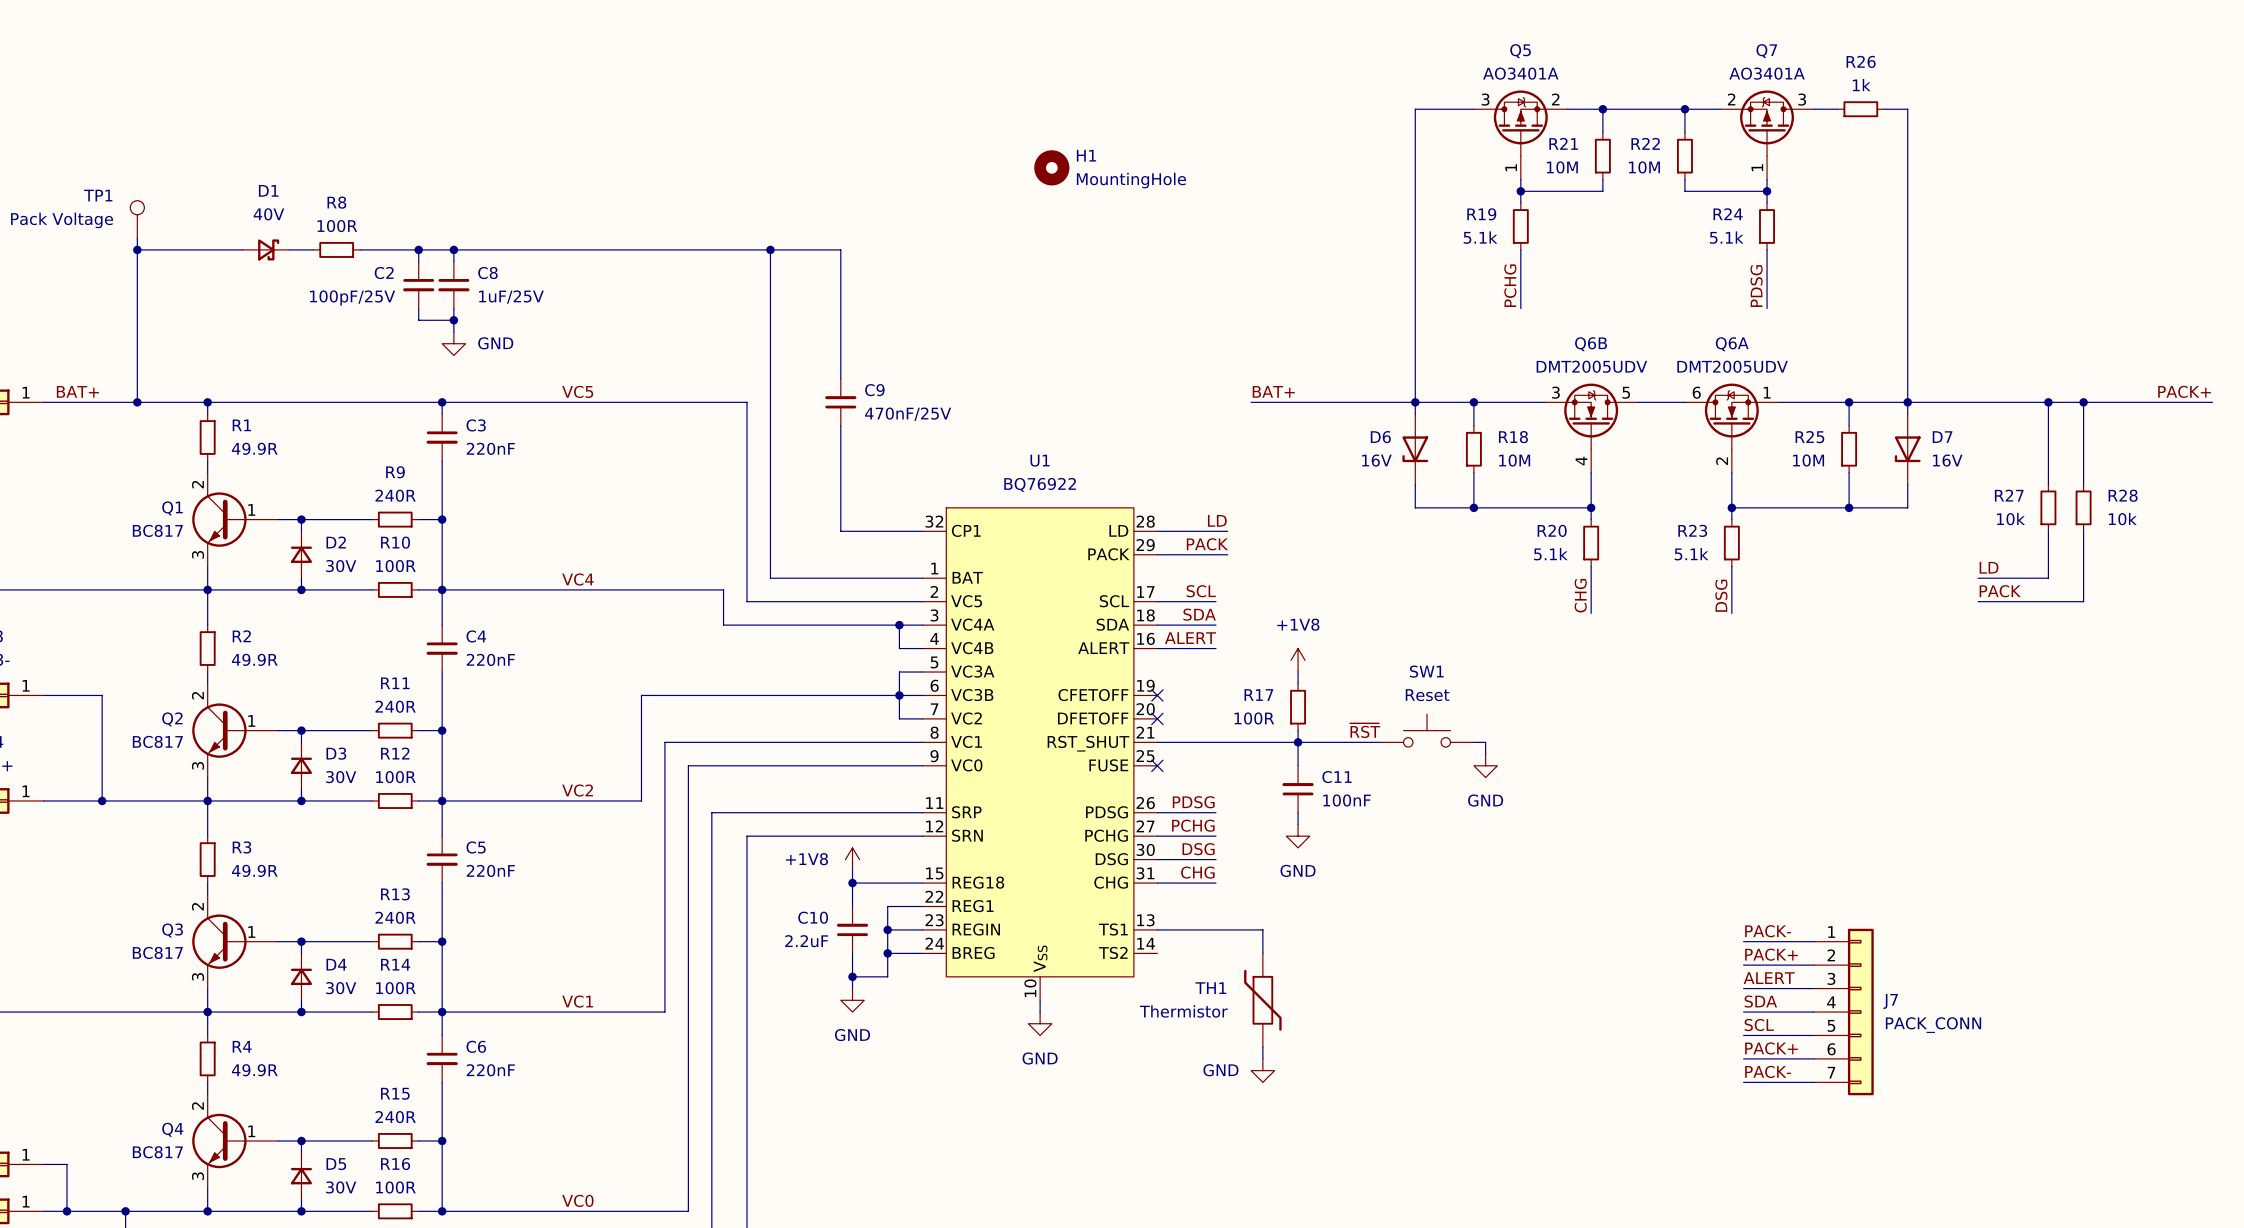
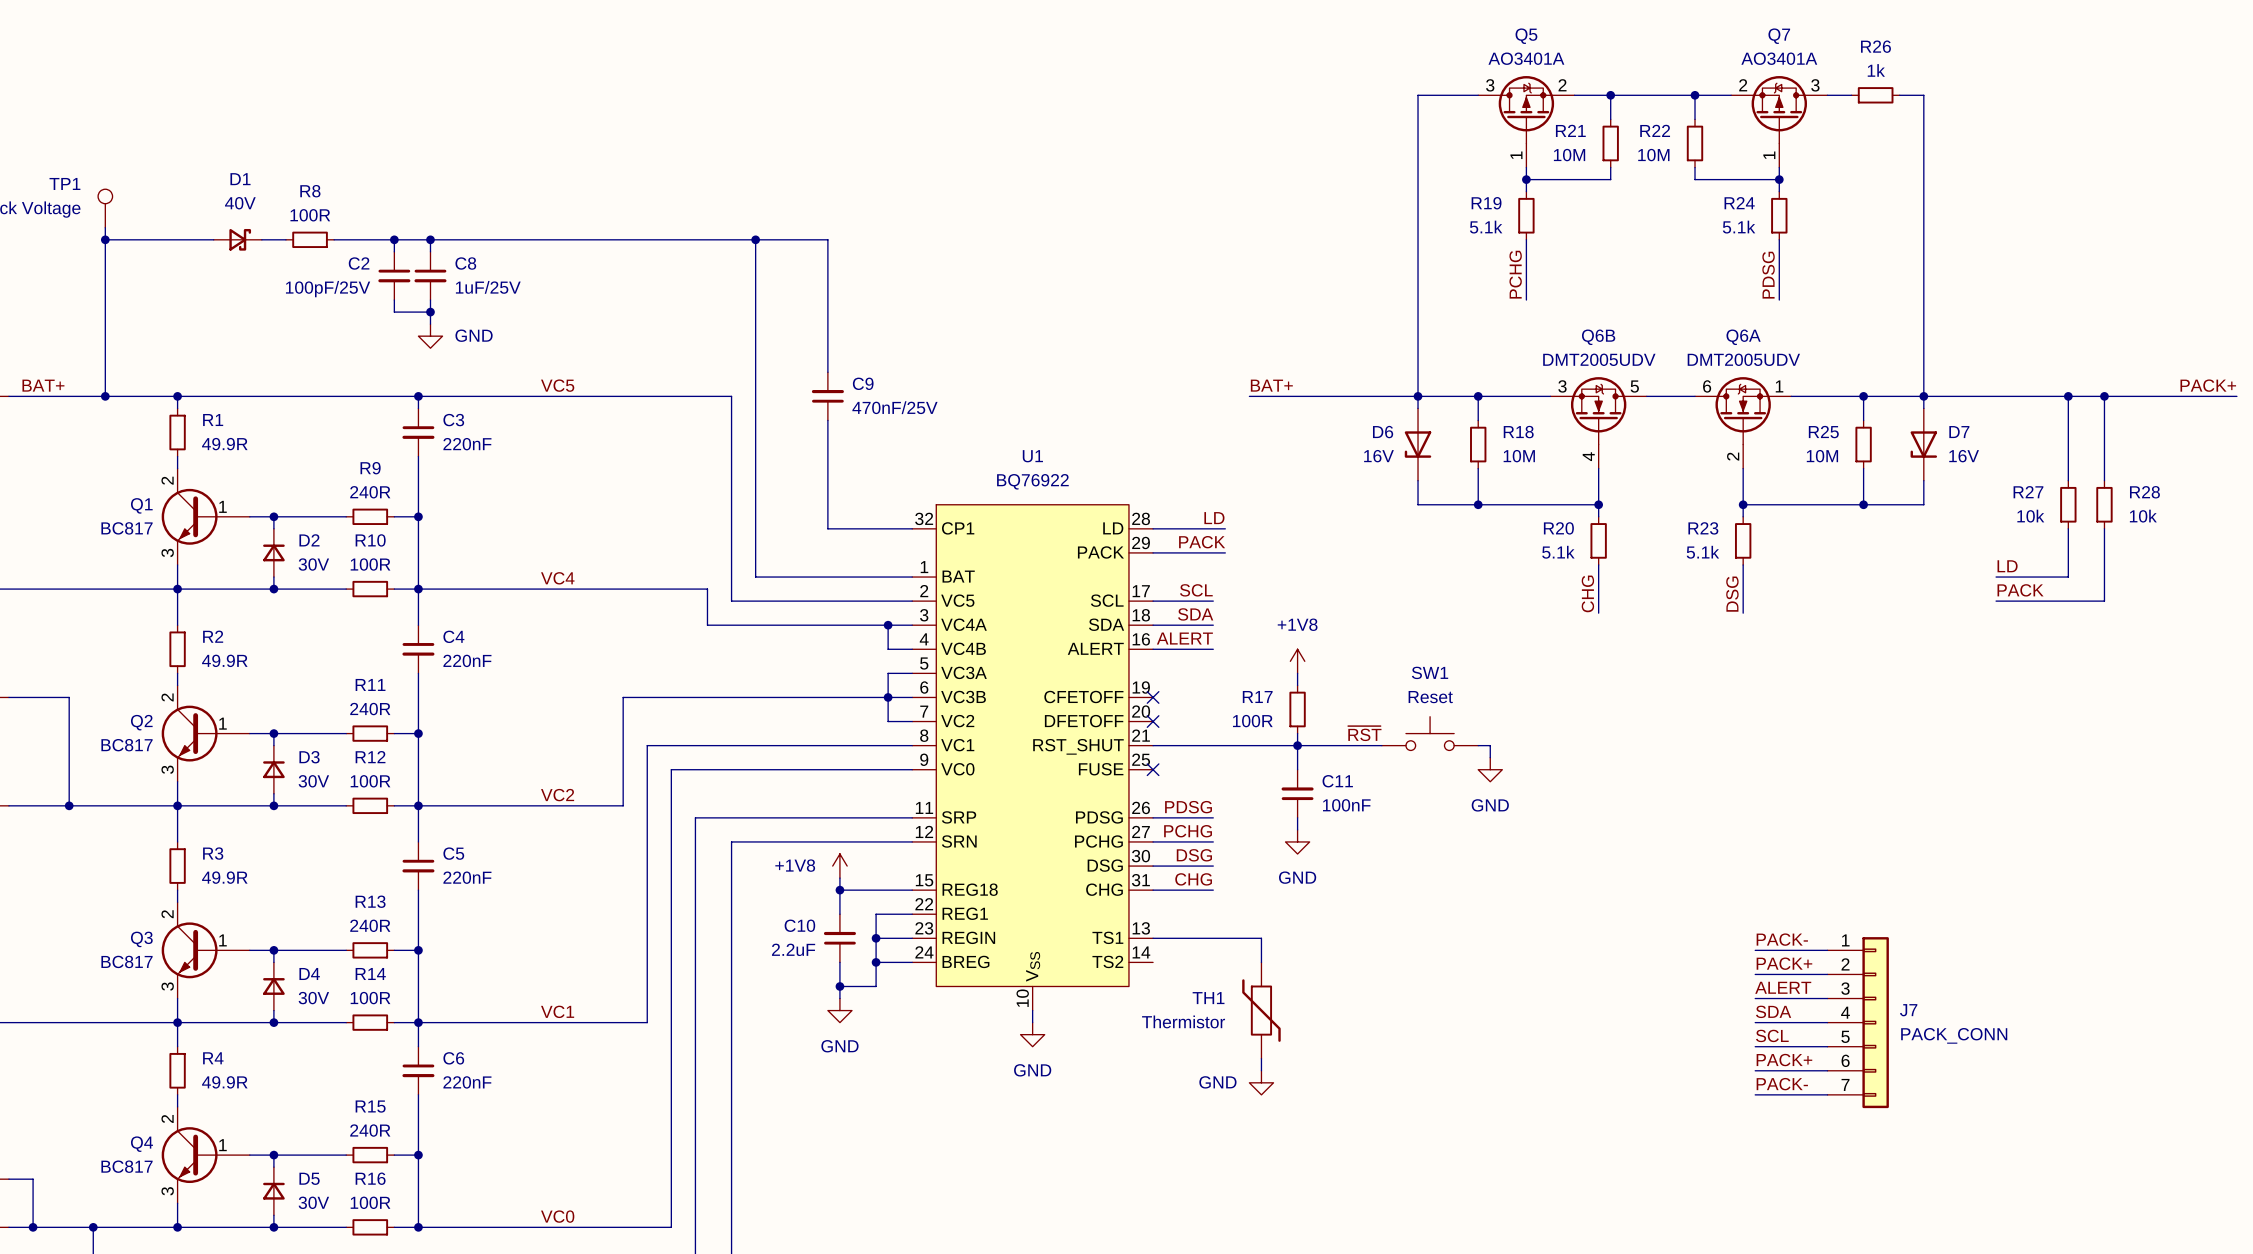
H1: MountingHole (1051, 167) -> none

